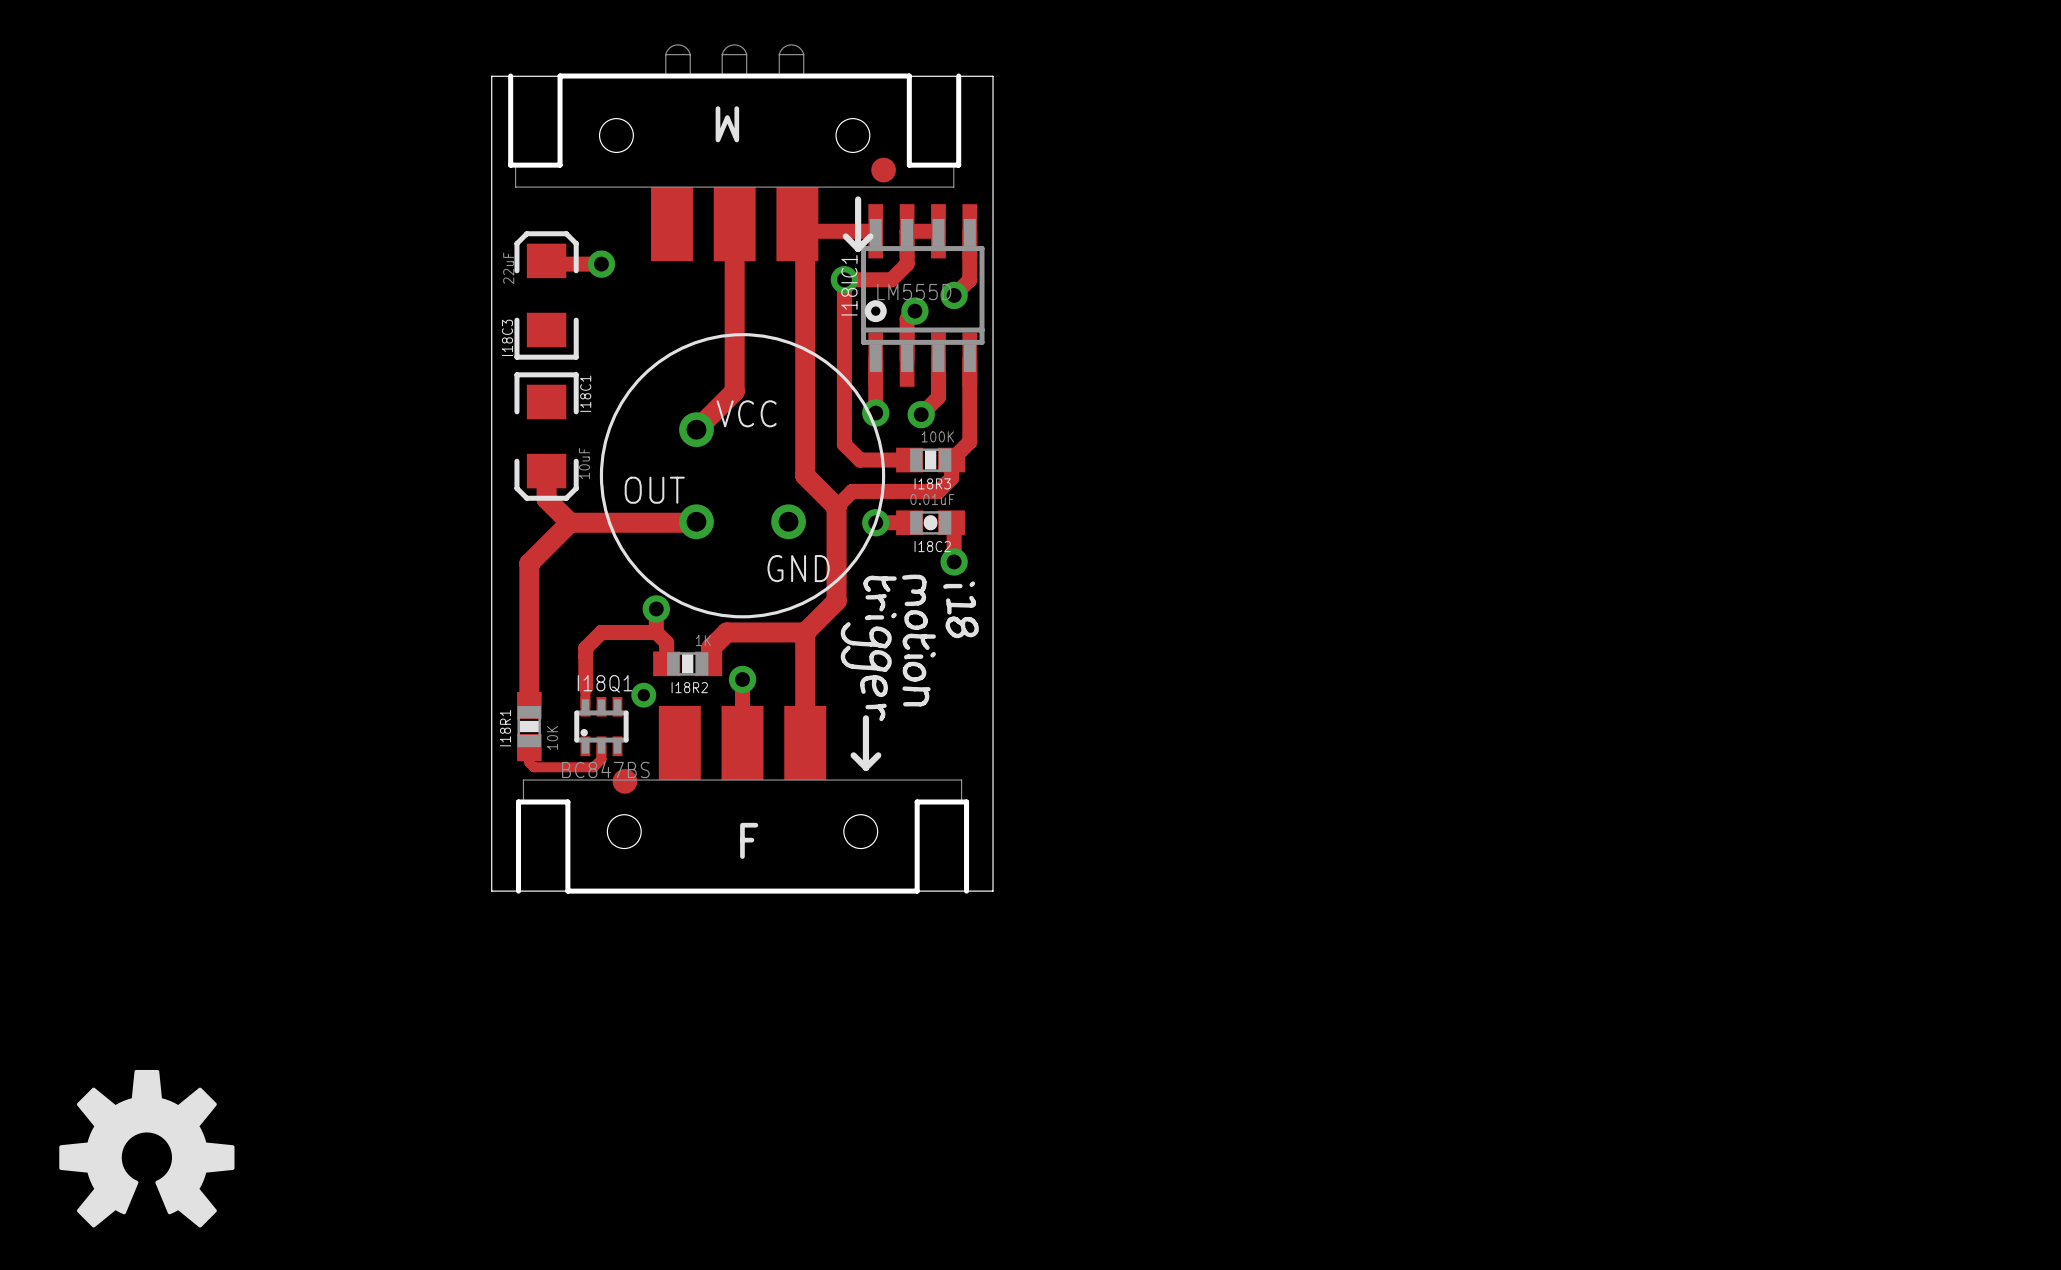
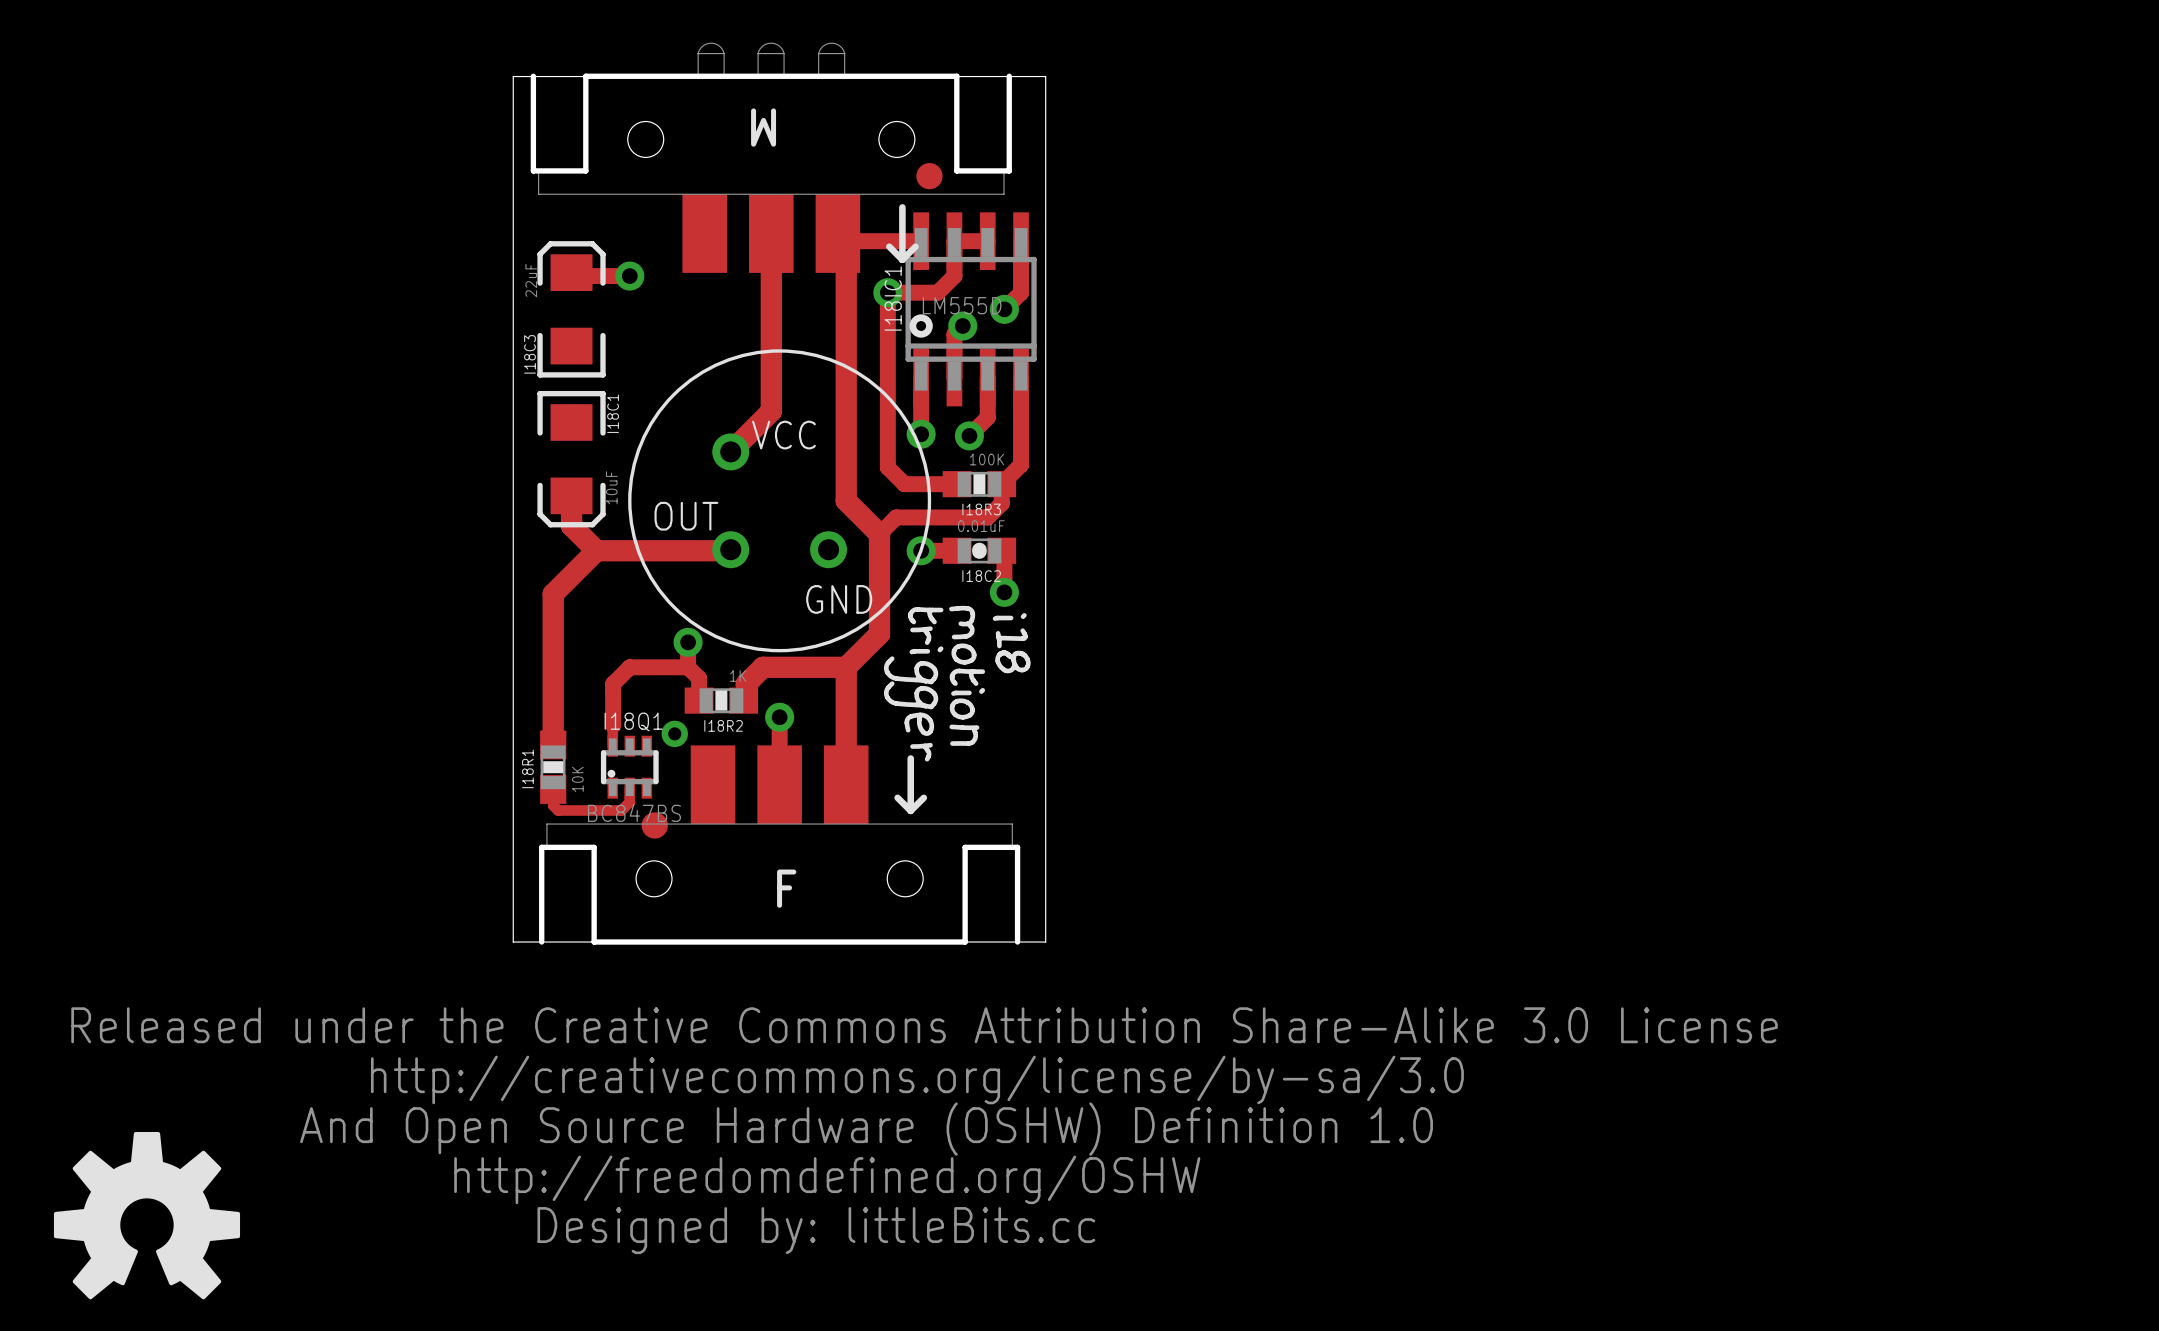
drawing: none -> [71, 1007, 1778, 1255]

